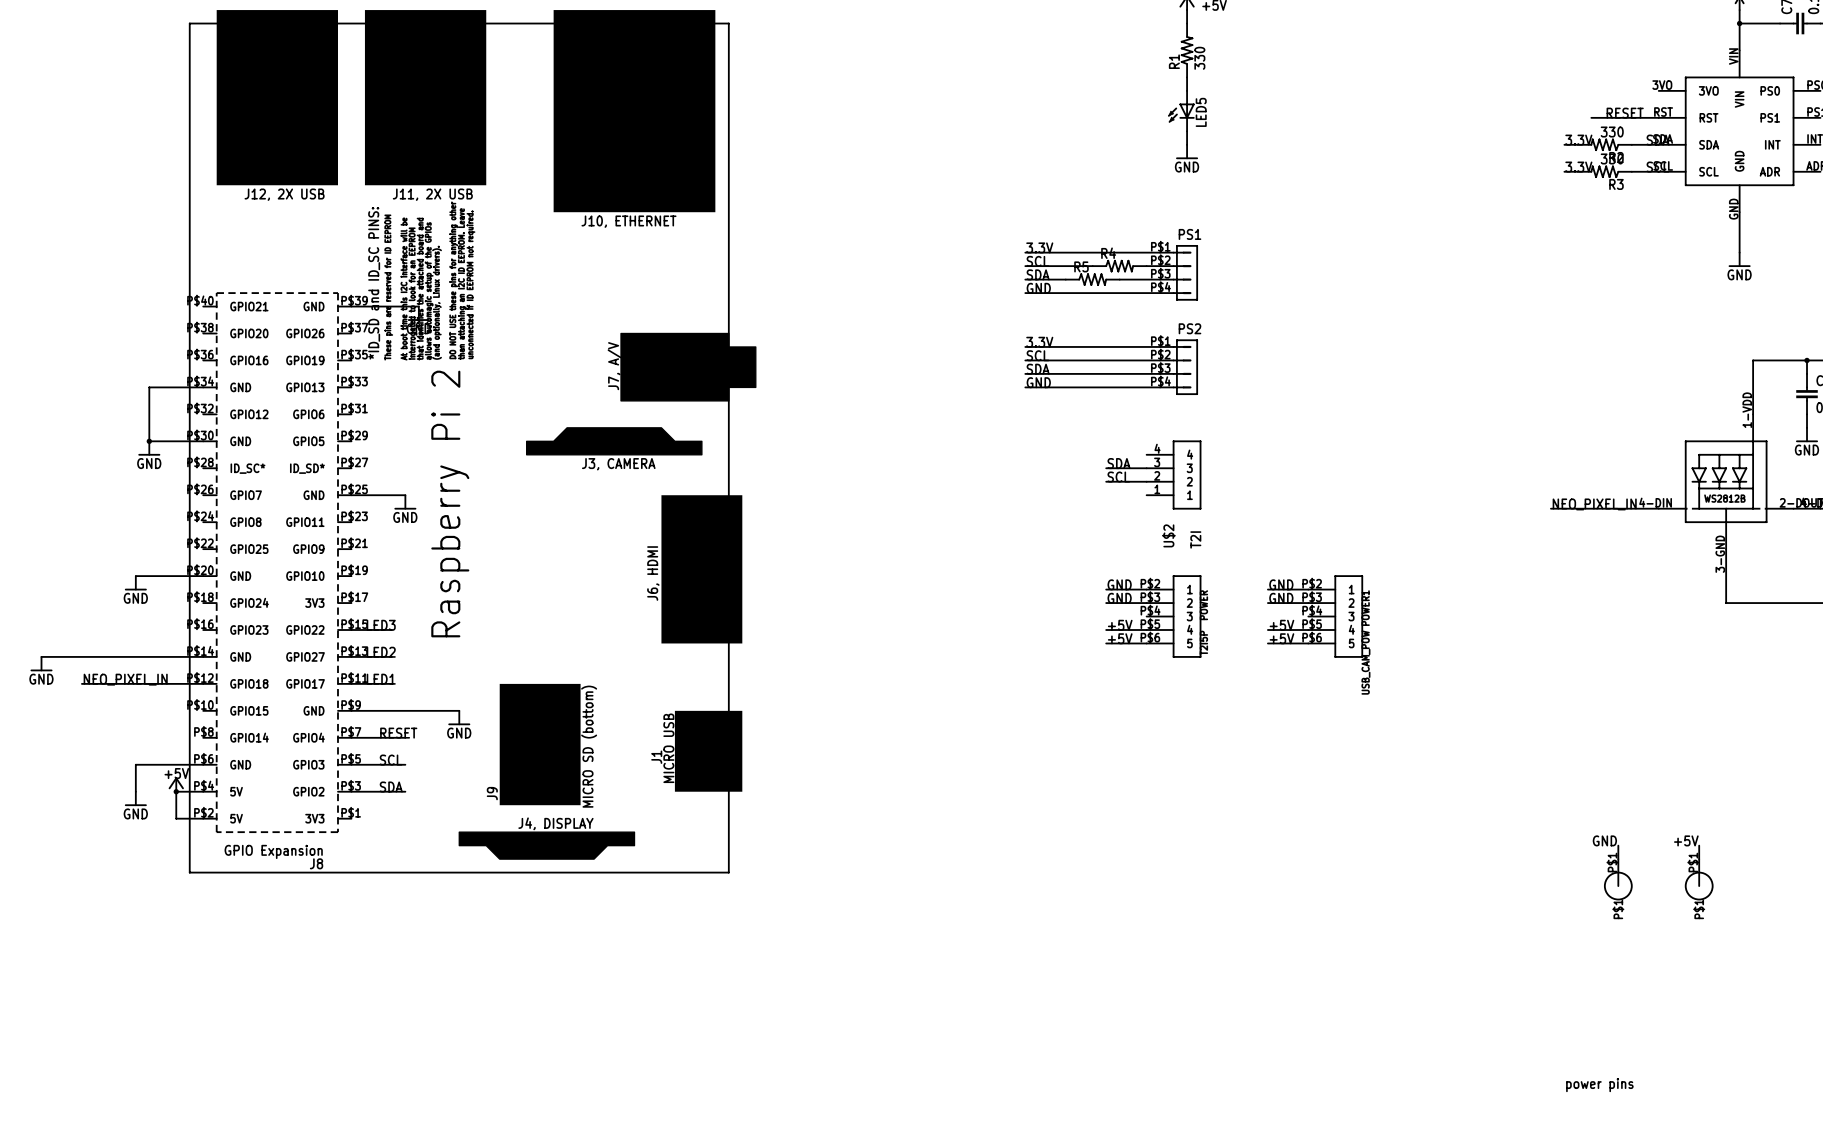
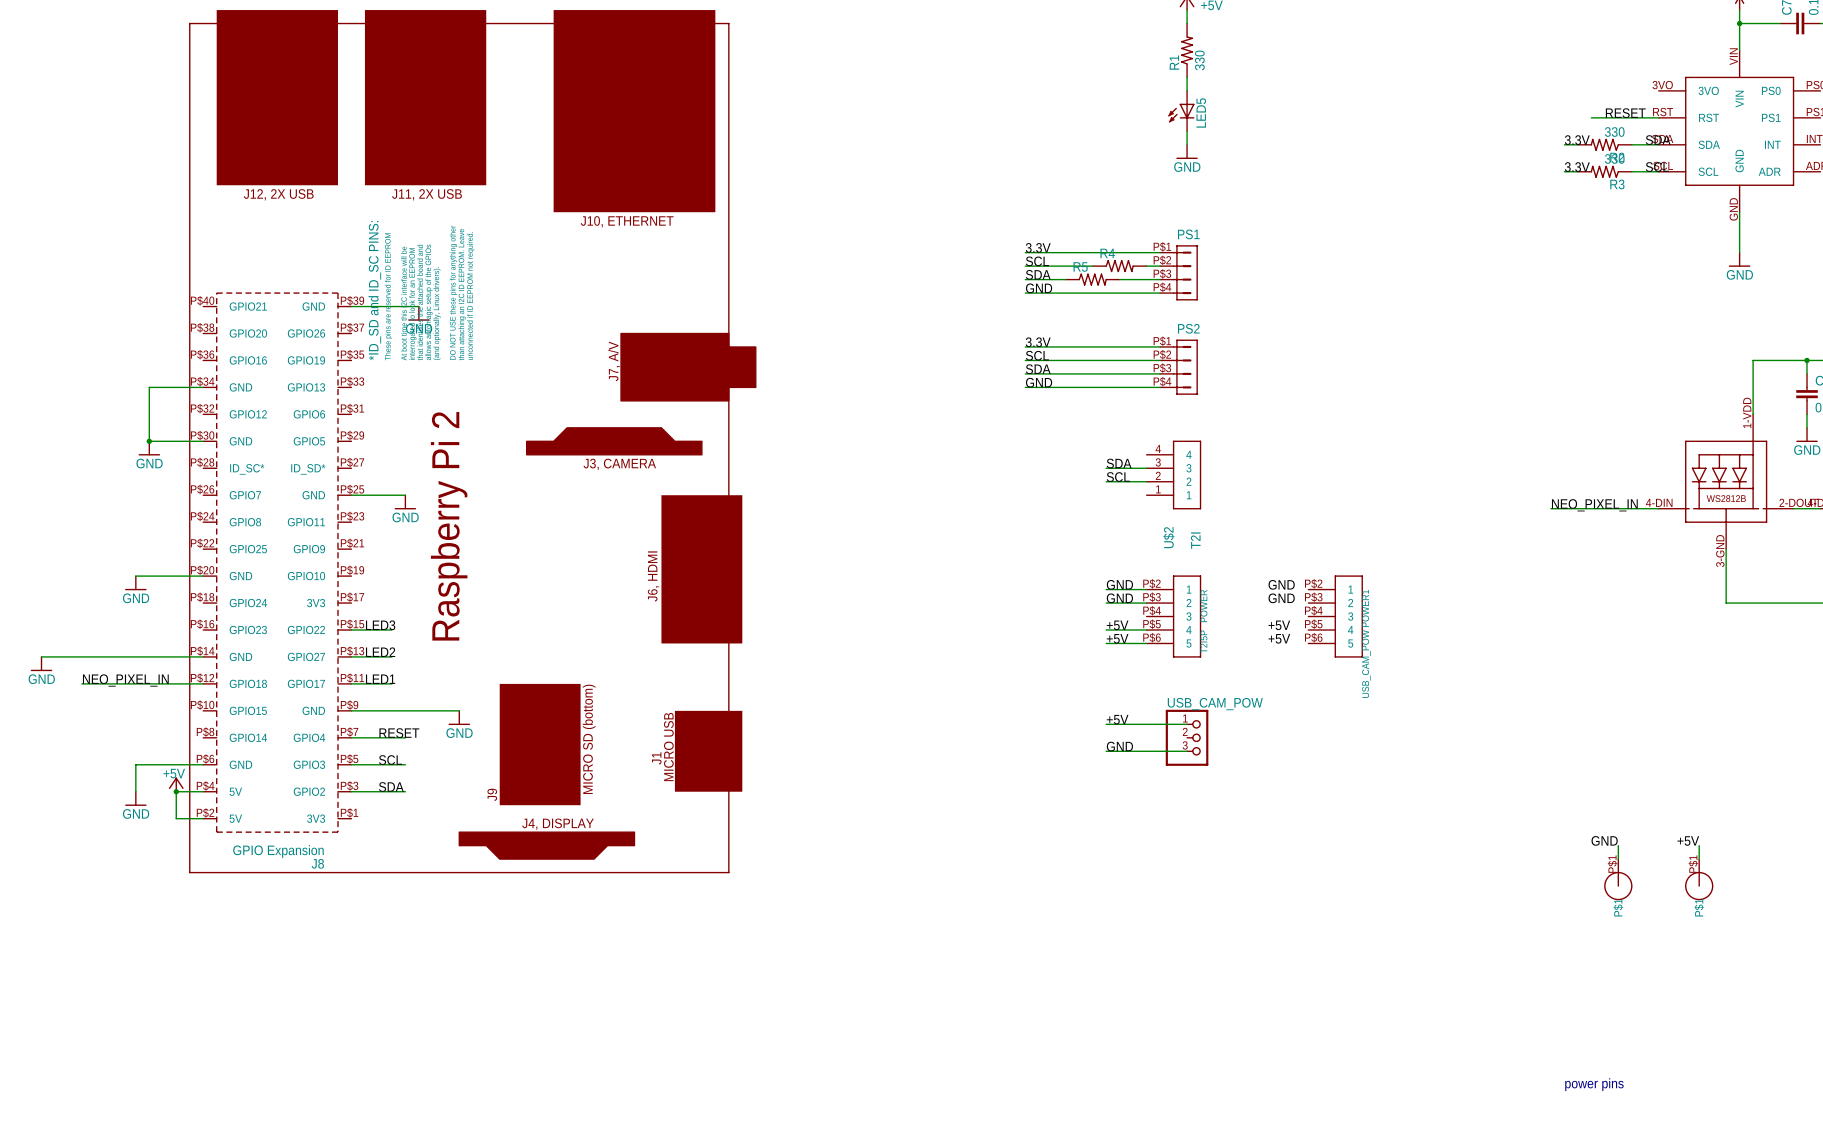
wire: (1267, 589) (1308, 589) -> none
wire: (1267, 603) (1308, 603) -> none
wire: (1267, 630) (1308, 630) -> none
wire: (1267, 643) (1308, 643) -> none
label: none -> +5V (1117, 719)
wire: none -> (1106, 724) (1187, 724)
USB_CAM_POW: none -> (1187, 737)
label: none -> GND (1119, 746)
wire: none -> (1106, 751) (1187, 751)

